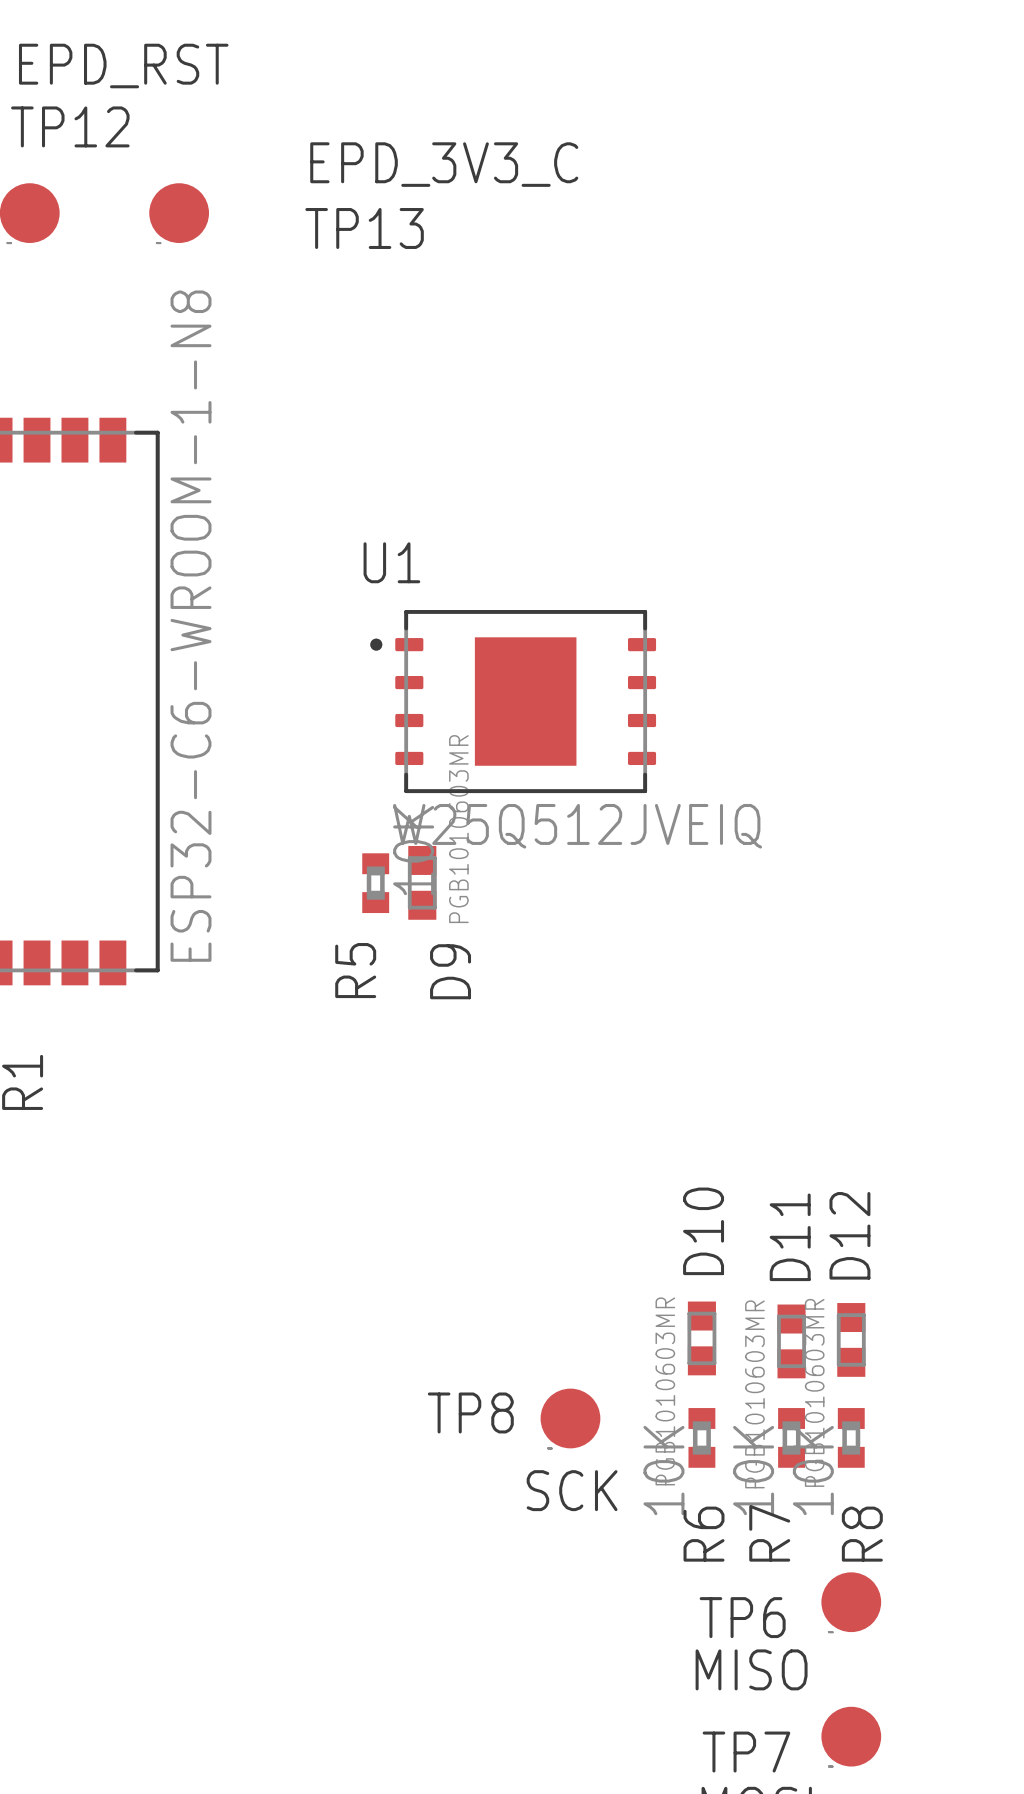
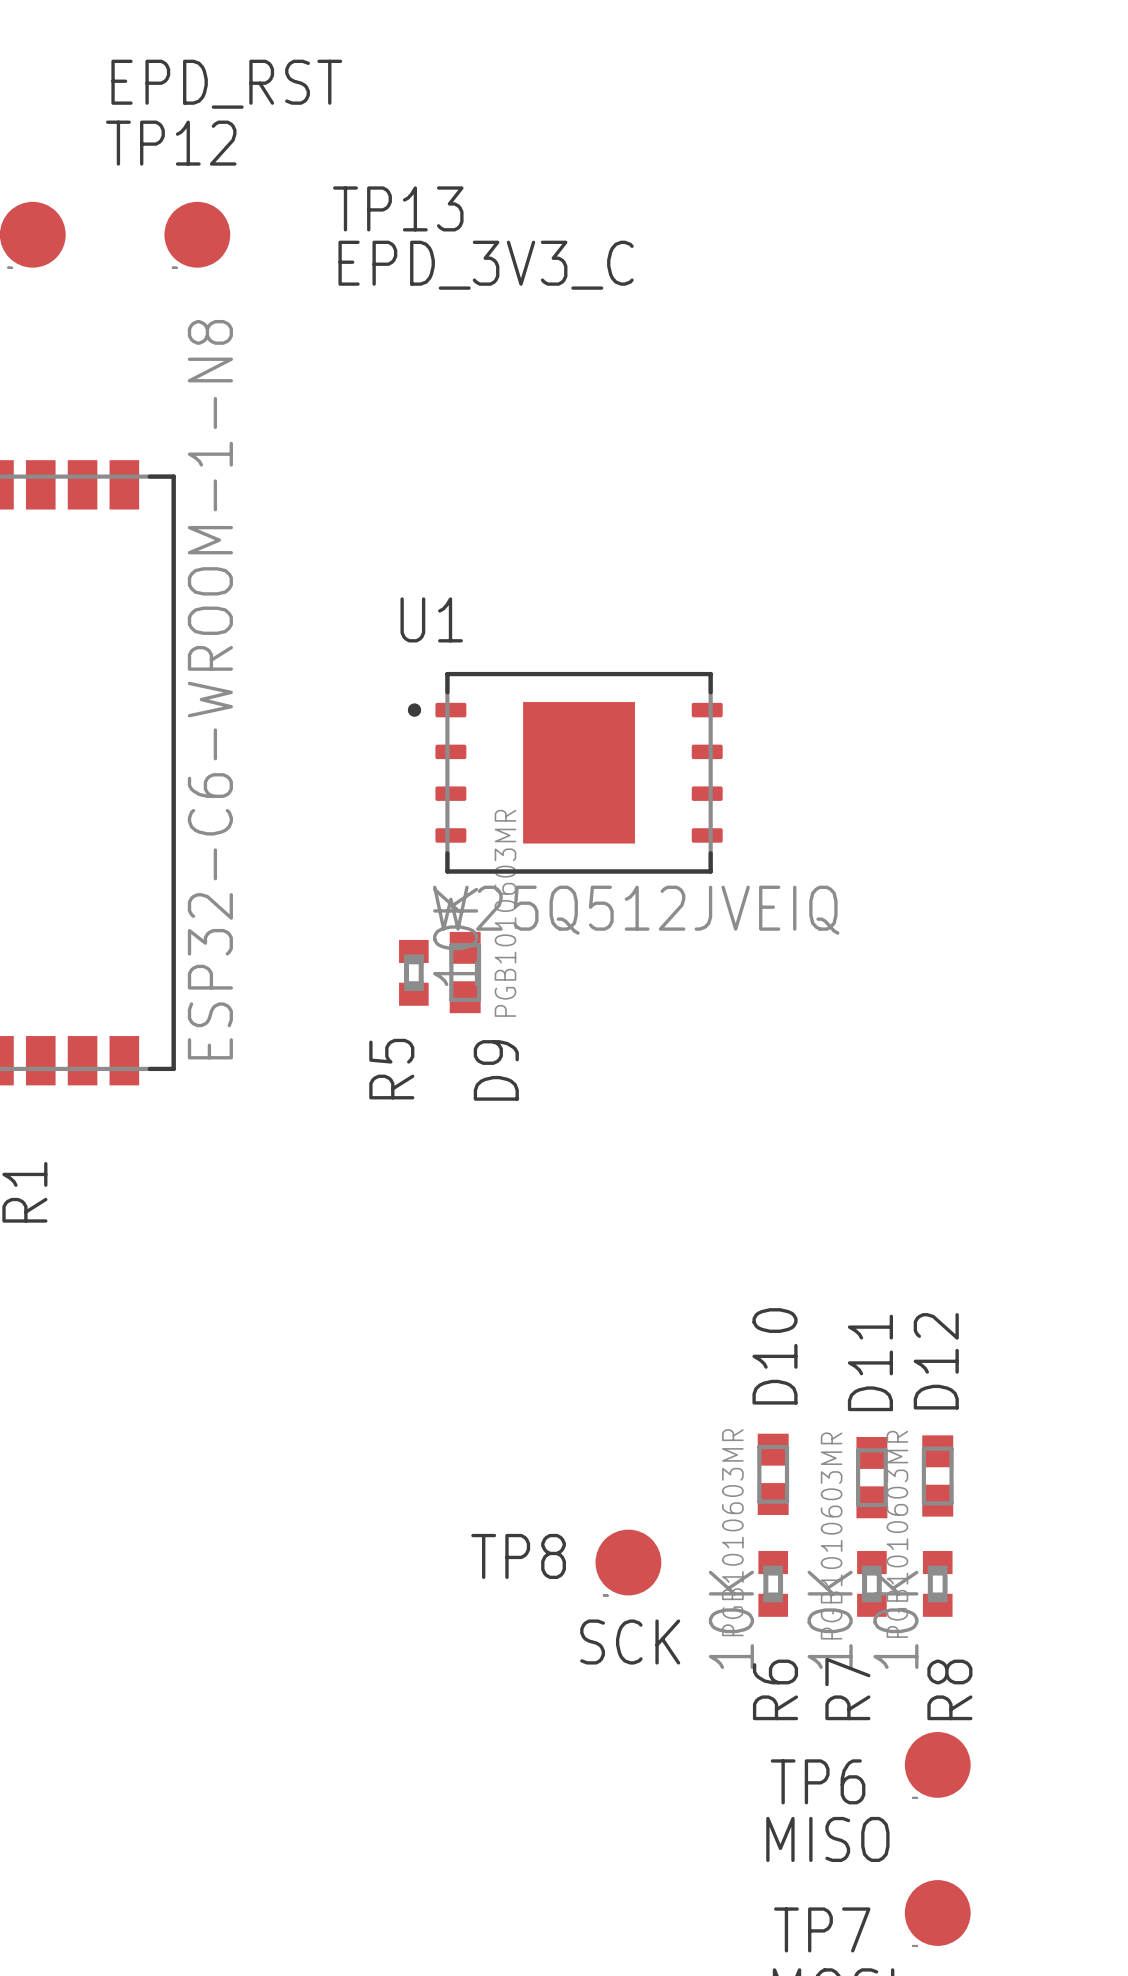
text position: EPD_RST (123, 65) -> EPD_RST (226, 84)
TP12 name position: TP12 (70, 126) -> TP12 (171, 143)
text position: EPD_3V3_C (444, 164) -> EPD_3V3_C (486, 265)
TP13 name position: TP13 (364, 228) -> TP13 (398, 208)

